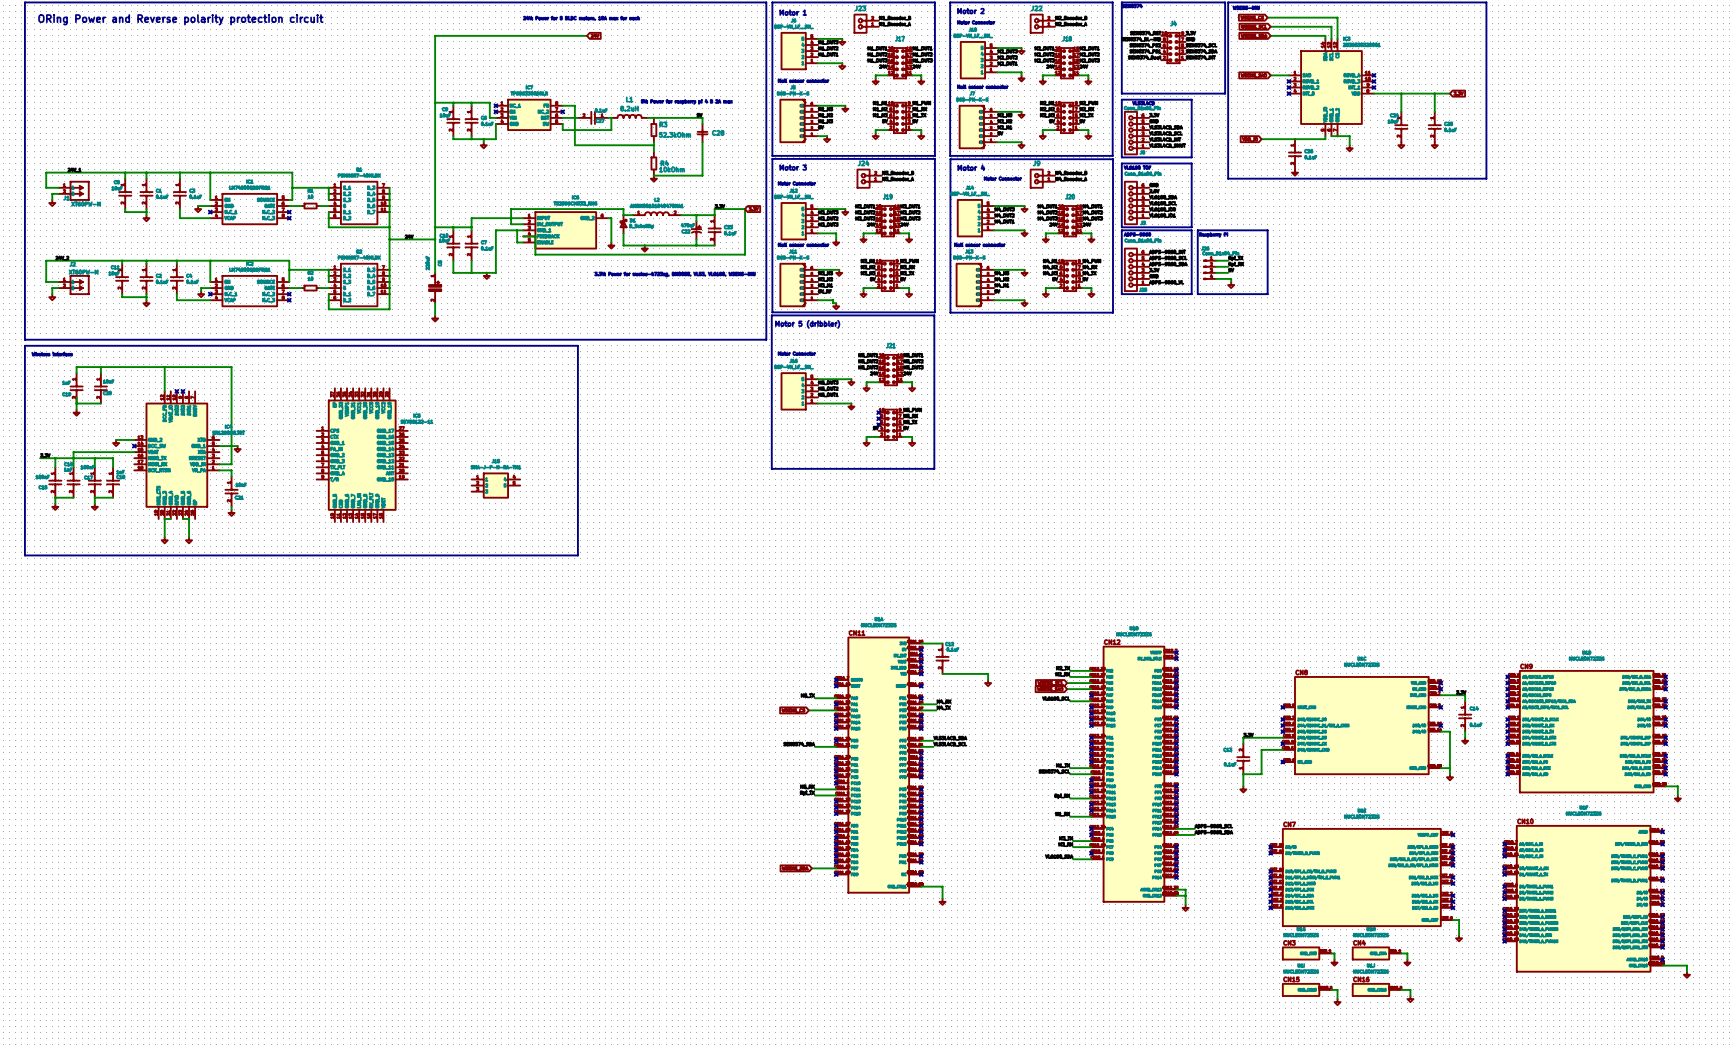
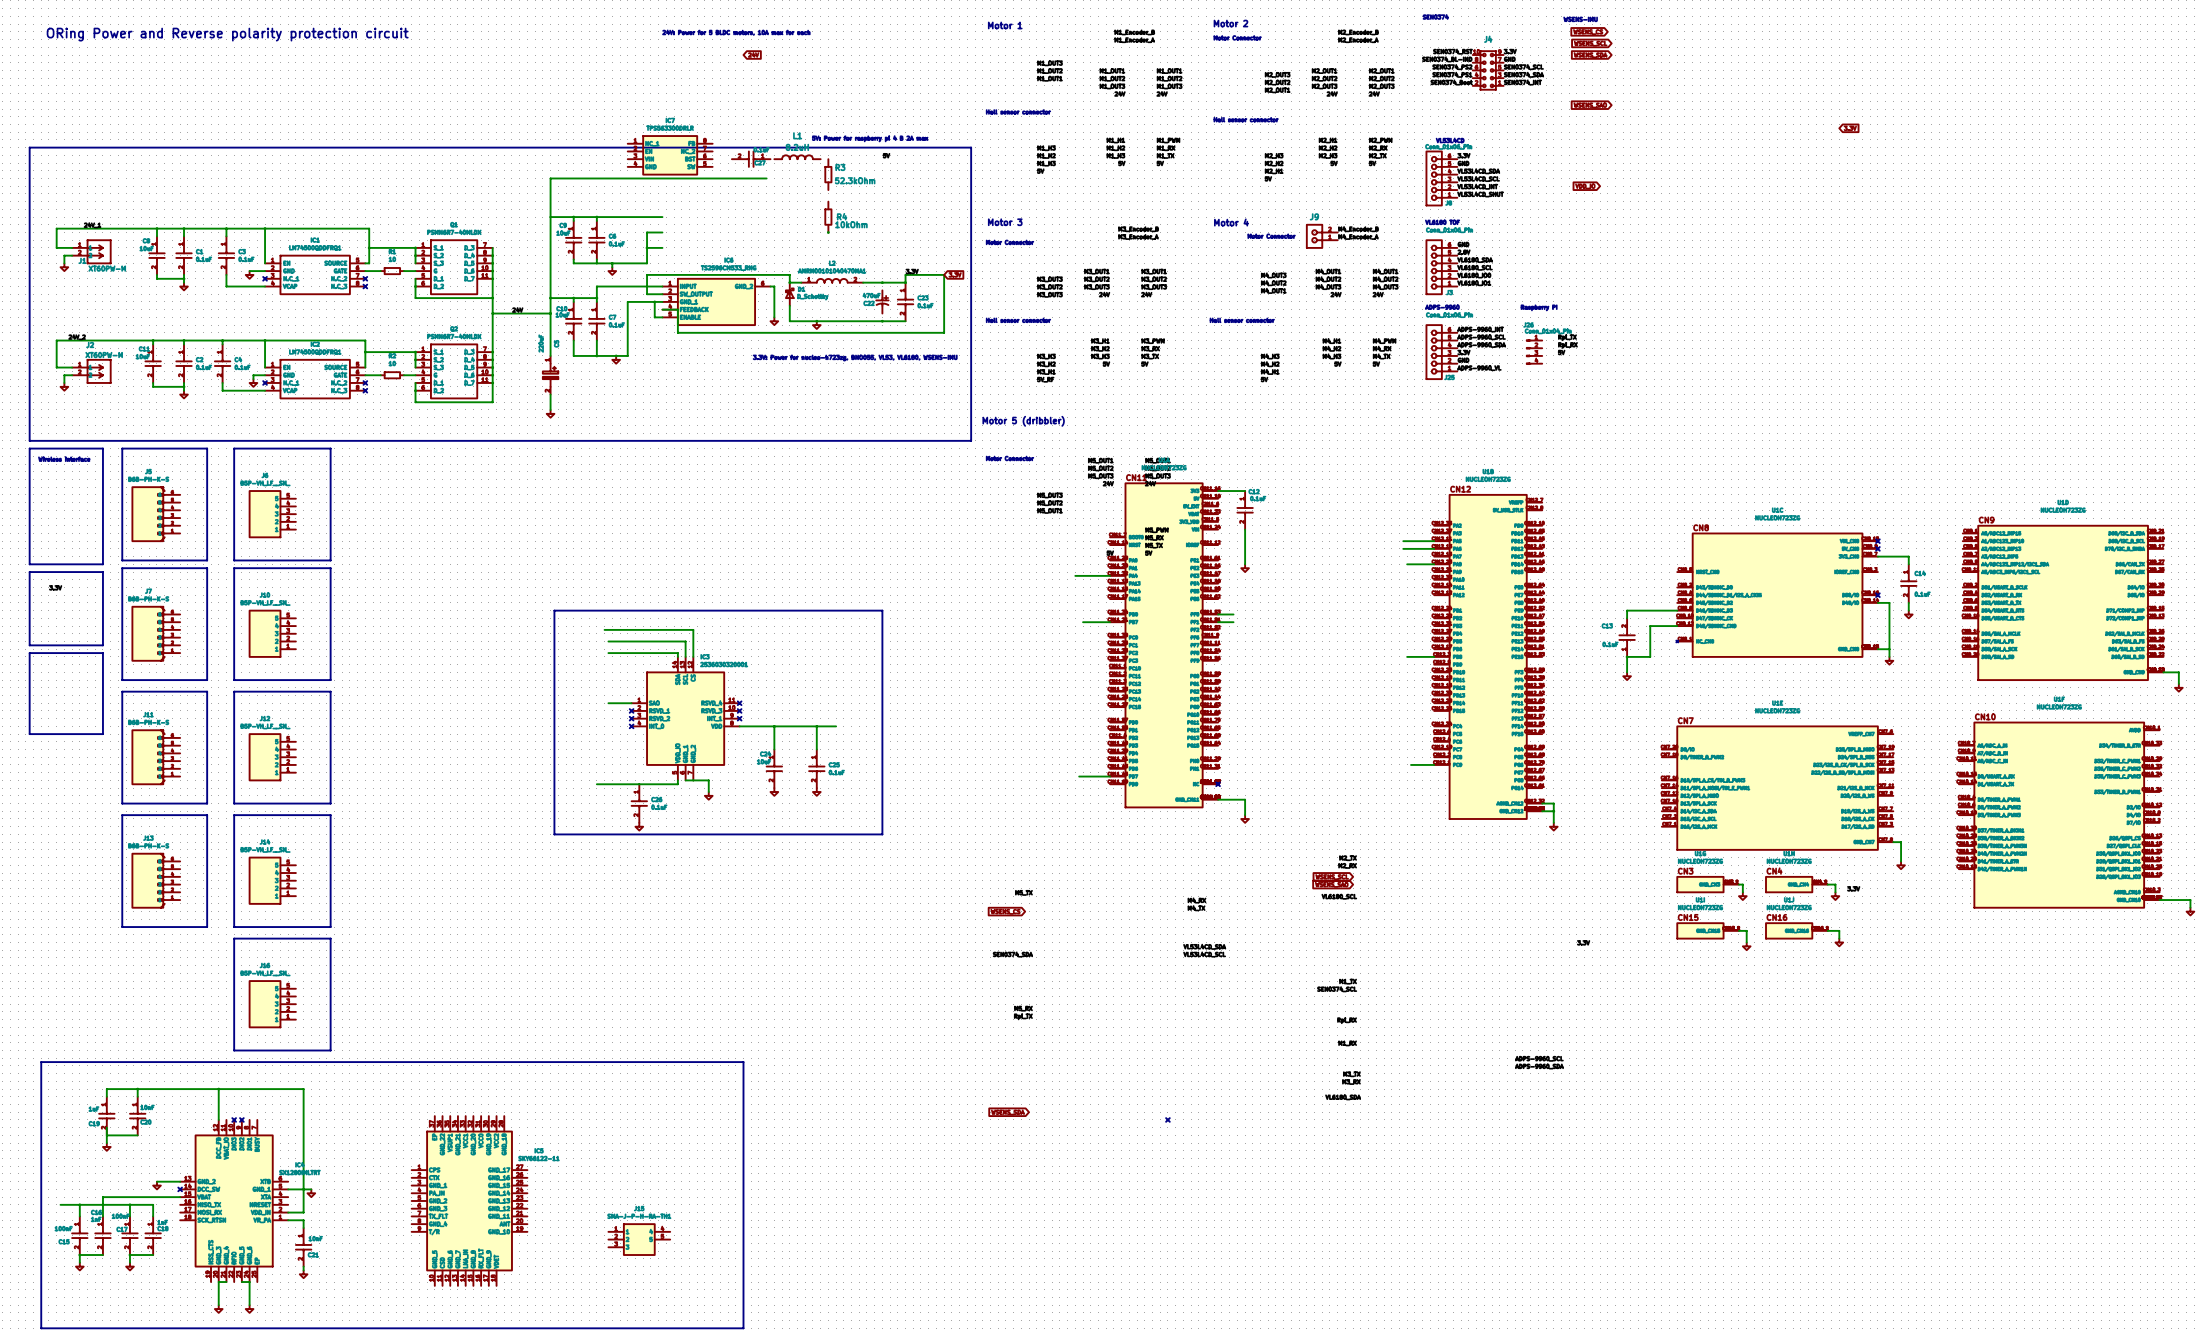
line: (772, 2) (934, 2) (934, 155) (772, 155) (772, 2) -> none
line: (950, 2) (1112, 2) (1112, 155) (950, 155) (950, 2) -> none
line: (1121, 2) (1225, 2) (1225, 93) (1121, 93) (1121, 2) -> none
line: (1228, 2) (1486, 2) (1486, 178) (1228, 178) (1228, 2) -> none
wire: (1267, 17) (1337, 17) (1337, 38) -> none
part: (866, 23) -> none
part: (1042, 23) -> none
wire: (1270, 26) (1331, 26) (1331, 38) -> none
wire: (587, 35) (435, 35) (435, 133) -> (766, 178) (550, 178)
wire: (1270, 35) (1325, 35) (1325, 38) -> none
wire: (817, 38) (842, 38) -> none
power symbol: (842, 41) -> none
wire: (997, 48) (1021, 48) -> none
part position: (799, 51) -> (272, 514)
power symbol: (1021, 51) -> none
part position: (978, 60) -> (272, 633)
wire: (817, 63) (842, 63) -> none
power symbol: (842, 66) -> none
wire: (997, 72) (1021, 72) (1021, 75) -> none
wire: (887, 75) (875, 75) (875, 78) -> none
wire: (912, 75) (921, 75) (921, 78) -> none
wire: (1054, 75) (1042, 75) (1042, 78) -> none
wire: (1079, 75) (1088, 75) (1088, 78) -> none
wire: (1270, 75) (1288, 75) -> none
no-connect mark: (1373, 75) -> none
power symbol: (1021, 78) -> none
power symbol: (875, 81) -> none
power symbol: (921, 81) -> none
power symbol: (1042, 81) -> none
power symbol: (1088, 81) -> none
no-connect mark: (1288, 81) -> none
no-connect mark: (1373, 81) -> none
no-connect mark: (1288, 87) -> none
part position: (1331, 87) -> (685, 718)
no-connect mark: (1373, 87) -> none
part: (900, 90) -> none
part: (1067, 90) -> none
no-connect mark: (1288, 93) -> none
wire: (1373, 93) (1449, 93) -> none
wire: (1401, 93) (1401, 111) -> none
wire: (1434, 93) (1434, 111) -> none
line: (1121, 99) (1121, 157) (1191, 157) (1191, 99) (1121, 99) -> none
wire: (435, 102) (489, 102) (489, 117) (495, 117) -> none
wire: (453, 102) (453, 105) -> none
wire: (471, 102) (471, 105) -> none
no-connect mark: (495, 105) -> none
wire: (562, 105) (574, 105) (574, 145) (653, 145) -> none
wire: (817, 105) (845, 105) -> none
line: (24, 108) (24, 2) (766, 2) (766, 108) -> (29, 147) (971, 147)
power symbol: (845, 108) -> none
no-connect mark: (495, 111) -> none
no-connect mark: (562, 111) -> none
wire: (997, 111) (1021, 111) -> none
power symbol: (1021, 114) -> none
wire: (562, 117) (577, 117) -> none
wire: (608, 117) (611, 117) (611, 130) (562, 130) (562, 123) -> none
wire: (647, 117) (702, 117) (702, 123) -> none
part position: (453, 120) -> (573, 240)
part position: (471, 120) -> (596, 240)
part position: (799, 120) -> (156, 514)
wire: (495, 123) (495, 139) (453, 139) (453, 136) -> none
part position: (978, 127) -> (156, 633)
part position: (1401, 127) -> (774, 768)
part position: (1434, 127) -> (816, 768)
wire: (887, 130) (875, 130) (875, 133) -> none
wire: (912, 130) (921, 130) (921, 133) -> none
wire: (1054, 130) (1042, 130) (1042, 133) -> none
wire: (1079, 130) (1088, 130) (1088, 133) -> none
part: (702, 133) -> none
wire: (471, 136) (471, 139) -> (573, 217) (573, 220)
wire: (817, 136) (827, 136) -> none
power symbol: (875, 136) -> none
power symbol: (921, 136) -> none
power symbol: (1042, 136) -> none
power symbol: (1088, 136) -> none
wire: (1325, 136) (1325, 139) (1261, 139) -> none
wire: (1331, 136) (1349, 136) (1349, 145) -> none
wire: (483, 139) (483, 142) -> (596, 217) (596, 220)
power symbol: (827, 139) -> none
wire: (653, 142) (653, 151) -> none
wire: (702, 142) (702, 175) (653, 175) -> none
wire: (997, 142) (1021, 142) -> none
power symbol: (483, 145) -> none
power symbol: (1021, 145) -> none
power symbol: (1401, 145) -> none
power symbol: (1434, 145) -> none
power symbol: (1349, 148) -> none
part position: (1294, 154) -> (639, 803)
line: (772, 158) (772, 312) (934, 312) (934, 158) (772, 158) -> none
line: (950, 159) (1112, 159) (1112, 312) (950, 312) (950, 159) -> none
wire: none -> (550, 217) (662, 217)
line: (1121, 163) (1121, 227) (1191, 227) (1191, 163) (1121, 163) -> none
power symbol: (1294, 172) -> none
wire: none -> (662, 232) (647, 232) (647, 263) (573, 263) (573, 259)
power symbol: (653, 178) -> none
part: (869, 178) -> none
wire: none -> (647, 247) (662, 247)
wire: none -> (596, 259) (596, 263)
wire: none -> (612, 263) (612, 267)
power symbol: none -> (612, 271)
wire: (994, 206) (1024, 206) -> none
wire: (817, 209) (845, 209) -> none
power symbol: (1024, 209) -> none
power symbol: (845, 212) -> none
wire: (696, 215) (696, 221) -> none
part position: (975, 218) -> (272, 880)
part position: (799, 221) -> (272, 757)
wire: (994, 230) (1024, 230) -> none
line: (1121, 230) (1191, 230) (1191, 294) (1121, 294) (1121, 230) -> none
line: (1197, 230) (1267, 230) (1267, 294) (1197, 294) (1197, 230) -> none
wire: (817, 233) (836, 233) (836, 239) -> none
wire: (875, 233) (863, 233) (863, 236) -> none
wire: (900, 233) (909, 233) (909, 236) -> none
power symbol: (1024, 233) -> none
wire: (1058, 233) (1045, 233) (1045, 236) -> none
wire: (1082, 233) (1091, 233) (1091, 236) -> none
wire: (696, 239) (696, 245) -> none
power symbol: (863, 239) -> none
power symbol: (909, 239) -> none
power symbol: (1045, 239) -> none
power symbol: (1091, 239) -> none
power symbol: (836, 242) -> none
part: (887, 248) -> none
part: (1070, 248) -> none
wire: (1215, 260) (1228, 260) -> none
wire: (1215, 266) (1228, 266) -> none
wire: (817, 269) (839, 269) -> none
wire: (994, 269) (1024, 269) -> none
power symbol: (839, 272) -> none
power symbol: (1024, 272) -> none
wire: (1215, 272) (1228, 272) -> none
wire: (1215, 278) (1231, 278) (1231, 281) -> none
part position: (799, 285) -> (156, 757)
part position: (975, 285) -> (156, 880)
power symbol: (1231, 285) -> none
wire: (875, 288) (863, 288) (863, 291) -> none
wire: (900, 288) (909, 288) (909, 291) -> none
wire: (1058, 288) (1045, 288) (1045, 291) -> none
wire: (1082, 288) (1091, 288) (1091, 291) -> none
power symbol: (863, 294) -> none
power symbol: (909, 294) -> none
power symbol: (1045, 294) -> none
power symbol: (1091, 294) -> none
wire: (817, 300) (833, 300) (833, 303) (836, 303) -> none
wire: (994, 300) (1024, 300) -> none
power symbol: (1024, 303) -> none
power symbol: (836, 306) -> none
line: (771, 315) (934, 315) (934, 468) (771, 468) (771, 315) -> none
line: (82, 345) (97, 345) -> (207, 448) (207, 560) (122, 560) (122, 448)
line: none -> (102, 448) (102, 564) (29, 564)
line: (164, 345) (185, 345) -> (330, 448) (330, 560) (234, 560) (234, 448)
line: (261, 345) (577, 345) (577, 555) (24, 555) -> none
wire: (100, 367) (100, 373) -> none
wire: (76, 373) (76, 367) (231, 367) (231, 464) (219, 464) -> none
wire: (817, 379) (851, 379) -> none
wire: none -> (1218, 491) (1245, 491)
power symbol: (851, 382) -> none
wire: (878, 382) (866, 382) (866, 385) -> none
part position: (76, 388) -> (106, 1116)
part position: (100, 388) -> (137, 1116)
power symbol: (866, 388) -> none
power symbol: (912, 388) -> none
no-connect mark: (176, 391) -> none
no-connect mark: (182, 391) -> none
part position: (799, 391) -> (272, 1004)
wire: (76, 397) (76, 409) -> none
part: (890, 397) -> none
wire: (76, 403) (100, 403) -> none
wire: (817, 403) (851, 403) -> none
power symbol: (851, 406) -> none
wire: none -> (1245, 529) (1245, 564)
power symbol: (76, 412) -> none
no-connect mark: (878, 412) -> none
no-connect mark: (878, 418) -> none
wire: none -> (1403, 541) (1434, 541)
no-connect mark: none -> (1877, 541)
no-connect mark: (878, 424) -> none
wire: none -> (1403, 548) (1434, 548)
no-connect mark: none -> (1877, 548)
wire: none -> (1877, 556) (1908, 556) (1908, 564)
line: (24, 436) (24, 443) -> (29, 645) (102, 645) (102, 572) (29, 572)
wire: (878, 436) (866, 436) (866, 439) -> none
wire: none -> (1407, 564) (1434, 564)
line: none -> (122, 568) (207, 568) (207, 680) (122, 680) (122, 568)
line: none -> (234, 568) (330, 568) (330, 680) (234, 680) (234, 568)
power symbol: none -> (1245, 568)
power symbol: (116, 443) -> none
power symbol: (866, 443) -> none
power symbol: (912, 443) -> none
no-connect mark: (134, 446) -> none
wire: (219, 446) (237, 446) -> none
wire: none -> (1075, 575) (1110, 575)
power symbol: (237, 449) -> none
wire: (134, 452) (73, 452) (73, 467) -> none
part position: (176, 455) -> (234, 1200)
part position: (362, 455) -> (469, 1200)
wire: (40, 458) (113, 458) (113, 467) -> none
wire: (55, 458) (55, 467) -> none
wire: (94, 458) (94, 467) -> none
no-connect mark: none -> (1877, 595)
wire: none -> (1877, 602) (1889, 602) (1889, 656)
wire: none -> (1908, 602) (1908, 610)
wire: (219, 470) (231, 470) (231, 476) -> none
line: none -> (554, 610) (882, 610) (882, 834) (554, 834) (554, 610)
wire: none -> (1677, 610) (1627, 610) (1627, 618)
wire: none -> (1218, 614) (1233, 614)
power symbol: none -> (1908, 614)
part position: (55, 482) -> (79, 1235)
part position: (73, 482) -> (102, 1235)
part position: (94, 482) -> (129, 1235)
part position: (113, 482) -> (153, 1235)
wire: none -> (1083, 622) (1110, 622)
wire: none -> (1218, 622) (1233, 622)
part position: (495, 485) -> (639, 1239)
wire: none -> (1677, 626) (1650, 626) (1650, 656) (1627, 656) (1627, 672)
wire: none -> (604, 629) (693, 629) (693, 656)
part position: (231, 491) -> (303, 1247)
wire: (73, 497) (55, 497) (55, 503) -> none
wire: (113, 497) (94, 497) (94, 503) -> none
wire: none -> (608, 641) (685, 641) (685, 656)
line: (24, 500) (24, 506) -> (29, 714) (29, 734) (102, 734) (102, 653) (29, 653)
wire: none -> (1877, 649) (1889, 649)
power symbol: (55, 506) -> none
power symbol: (94, 506) -> none
wire: (231, 506) (231, 509) -> none
wire: none -> (608, 653) (677, 653) (677, 656)
wire: none -> (1407, 656) (1434, 656)
power symbol: (231, 512) -> none
power symbol: none -> (1889, 660)
wire: (170, 518) (164, 518) (164, 537) -> none
wire: (182, 518) (189, 518) (189, 537) -> none
wire: none -> (2163, 672) (2178, 672) (2178, 683)
power symbol: none -> (1627, 676)
power symbol: none -> (2178, 687)
line: none -> (122, 691) (122, 803) (207, 803) (207, 691) (122, 691)
line: none -> (234, 691) (234, 803) (330, 803) (330, 691) (234, 691)
power symbol: (164, 540) -> none
power symbol: (189, 540) -> none
wire: none -> (608, 703) (631, 703)
no-connect mark: none -> (739, 703)
no-connect mark: none -> (631, 710)
no-connect mark: none -> (739, 710)
no-connect mark: none -> (631, 718)
no-connect mark: none -> (739, 718)
no-connect mark: none -> (631, 726)
wire: none -> (739, 726) (836, 726)
wire: none -> (774, 726) (774, 749)
wire: none -> (816, 726) (816, 749)
wire: none -> (1411, 764) (1434, 764)
wire: none -> (1079, 776) (1110, 776)
wire: none -> (677, 780) (677, 784) (596, 784)
wire: none -> (685, 780) (708, 780) (708, 791)
no-connect mark: none -> (1218, 784)
power symbol: none -> (774, 791)
power symbol: none -> (816, 791)
power symbol: none -> (708, 795)
wire: none -> (1218, 799) (1245, 799) (1245, 815)
wire: none -> (1542, 803) (1553, 803) (1553, 822)
wire: none -> (1542, 811) (1553, 811)
line: none -> (122, 815) (122, 927) (207, 927) (207, 815) (122, 815)
line: none -> (234, 815) (330, 815) (330, 927) (234, 927) (234, 815)
power symbol: none -> (639, 826)
wire: (921, 643) (942, 643) -> none
power symbol: none -> (1553, 826)
no-connect mark: (921, 649) -> none
no-connect mark: (1176, 652) -> none
no-connect mark: (921, 655) -> none
wire: none -> (1893, 842) (1901, 842) (1901, 861)
part position: (942, 658) -> (1245, 510)
no-connect mark: (1176, 658) -> none
no-connect mark: (921, 661) -> none
no-connect mark: (921, 667) -> none
wire: (1070, 670) (1091, 670) -> none
no-connect mark: (1176, 670) -> none
no-connect mark: (921, 673) -> none
wire: (942, 673) (988, 673) (988, 680) -> none
power symbol: none -> (1901, 865)
wire: (1070, 676) (1091, 676) -> none
no-connect mark: (1176, 676) -> none
no-connect mark: (1507, 676) -> none
no-connect mark: (1665, 676) -> none
no-connect mark: (836, 680) -> none
power symbol position: (988, 683) -> (1245, 818)
wire: (1067, 683) (1091, 683) -> none
no-connect mark: (1176, 683) -> none
no-connect mark: (1440, 683) -> none
no-connect mark: (1507, 683) -> none
no-connect mark: (1665, 683) -> none
no-connect mark: (836, 686) -> none
no-connect mark: (921, 686) -> none
wire: (1067, 689) (1091, 689) -> none
no-connect mark: (1176, 689) -> none
wire: none -> (1827, 884) (1835, 884) (1835, 892)
no-connect mark: (1440, 689) -> none
no-connect mark: (1507, 689) -> none
no-connect mark: (1665, 689) -> none
no-connect mark: (1091, 695) -> none
no-connect mark: (1176, 695) -> none
wire: (1440, 695) (1465, 695) (1465, 701) -> none
no-connect mark: (1507, 695) -> none
wire: (814, 698) (836, 698) -> none
no-connect mark: (921, 698) -> none
power symbol: none -> (1742, 896)
power symbol: none -> (1835, 896)
wire: (1070, 701) (1091, 701) -> none
no-connect mark: (1176, 701) -> none
no-connect mark: (1507, 701) -> none
no-connect mark: (1665, 701) -> none
wire: none -> (2159, 900) (2190, 900) (2190, 907)
no-connect mark: (836, 704) -> none
wire: (921, 704) (936, 704) -> none
no-connect mark: (1091, 707) -> none
no-connect mark: (1176, 707) -> none
no-connect mark: (1282, 707) -> none
no-connect mark: (1440, 707) -> none
no-connect mark: (1507, 707) -> none
no-connect mark: (1665, 707) -> none
wire: (808, 710) (836, 710) -> none
wire: (921, 710) (936, 710) -> none
power symbol: none -> (2190, 911)
no-connect mark: (1091, 713) -> none
no-connect mark: (836, 716) -> none
no-connect mark: (921, 716) -> none
part position: (1465, 716) -> (1908, 583)
no-connect mark: (1091, 719) -> none
no-connect mark: (1176, 719) -> none
no-connect mark: (1282, 719) -> none
no-connect mark: (1507, 719) -> none
no-connect mark: (1665, 719) -> none
no-connect mark: (836, 722) -> none
no-connect mark: (921, 722) -> none
no-connect mark: (1091, 725) -> none
no-connect mark: (1176, 725) -> none
no-connect mark: (1282, 725) -> none
part position: (1361, 725) -> (1777, 595)
wire: none -> (1827, 930) (1839, 930) (1839, 938)
no-connect mark: (1440, 725) -> none
no-connect mark: (1507, 725) -> none
no-connect mark: (1665, 725) -> none
no-connect mark: (836, 728) -> none
no-connect mark: (921, 728) -> none
line: none -> (234, 938) (234, 1050) (330, 1050) (330, 938) (234, 938)
no-connect mark: (1176, 731) -> none
no-connect mark: (1282, 731) -> none
wire: (1440, 731) (1449, 731) (1449, 774) -> none
wire: (1465, 731) (1465, 737) -> none
no-connect mark: (1507, 731) -> none
part position: (1586, 731) -> (2063, 602)
no-connect mark: (1091, 737) -> none
no-connect mark: (1176, 737) -> none
wire: (1282, 737) (1243, 737) (1243, 743) -> none
power symbol: none -> (1746, 946)
no-connect mark: (1507, 737) -> none
no-connect mark: (1665, 737) -> none
no-connect mark: (836, 740) -> none
wire: (921, 740) (933, 740) -> none
power symbol position: (1465, 740) -> (1839, 942)
no-connect mark: (1091, 743) -> none
no-connect mark: (1176, 743) -> none
no-connect mark: (1282, 743) -> none
no-connect mark: (1507, 743) -> none
no-connect mark: (1665, 743) -> none
wire: (814, 746) (836, 746) -> none
wire: (921, 746) (933, 746) -> none
no-connect mark: (1091, 749) -> none
no-connect mark: (1176, 749) -> none
wire: (1282, 749) (1261, 749) (1261, 774) (1243, 774) (1243, 786) -> none
no-connect mark: (921, 752) -> none
no-connect mark: (1091, 755) -> none
no-connect mark: (1176, 755) -> none
no-connect mark: (1507, 755) -> none
no-connect mark: (1665, 755) -> none
no-connect mark: (836, 759) -> none
no-connect mark: (921, 759) -> none
part position: (1243, 759) -> (1627, 637)
no-connect mark: (1091, 762) -> none
no-connect mark: (1176, 762) -> none
no-connect mark: (1282, 762) -> none
no-connect mark: (1507, 762) -> none
no-connect mark: (1665, 762) -> none
no-connect mark: (836, 765) -> none
part position: (879, 765) -> (1164, 645)
no-connect mark: (921, 765) -> none
wire: (1070, 768) (1091, 768) -> none
no-connect mark: (1176, 768) -> none
wire: (1440, 768) (1449, 768) -> none
no-connect mark: (1507, 768) -> none
no-connect mark: (1665, 768) -> none
no-connect mark: (836, 771) -> none
no-connect mark: (921, 771) -> none
wire: (1070, 774) (1091, 774) -> none
part position: (1133, 774) -> (1488, 656)
no-connect mark: (1176, 774) -> none
no-connect mark: (1507, 774) -> none
no-connect mark: (1665, 774) -> none
no-connect mark: (836, 777) -> none
no-connect mark: (921, 777) -> none
power symbol: (1449, 777) -> none
no-connect mark: (1091, 780) -> none
no-connect mark: (836, 783) -> none
no-connect mark: (1091, 786) -> none
no-connect mark: (1176, 786) -> none
wire: (1665, 786) (1677, 786) (1677, 795) -> none
wire: (814, 789) (836, 789) -> none
no-connect mark: (921, 789) -> none
power symbol: (1243, 789) -> none
no-connect mark: (1091, 792) -> none
no-connect mark: (1176, 792) -> none
wire: (814, 795) (836, 795) -> none
no-connect mark: (921, 795) -> none
wire: (1070, 798) (1091, 798) -> none
no-connect mark: (1176, 798) -> none
power symbol: (1677, 798) -> none
no-connect mark: (836, 801) -> none
no-connect mark: (921, 801) -> none
no-connect mark: (1091, 804) -> none
no-connect mark: (1176, 804) -> none
no-connect mark: (836, 807) -> none
no-connect mark: (921, 807) -> none
no-connect mark: (1091, 810) -> none
no-connect mark: (1176, 810) -> none
no-connect mark: (836, 813) -> none
no-connect mark: (921, 813) -> none
wire: (1070, 816) (1091, 816) -> none
no-connect mark: (1176, 816) -> none
no-connect mark: (921, 819) -> none
no-connect mark: (1176, 822) -> none
no-connect mark: (836, 825) -> none
no-connect mark: (921, 825) -> none
line: none -> (41, 1062) (743, 1062) (743, 1328) (41, 1328) (41, 1062)
no-connect mark: (1091, 828) -> none
wire: (1176, 828) (1194, 828) -> none
no-connect mark: (836, 831) -> none
no-connect mark: (921, 831) -> none
no-connect mark: (1662, 831) -> none
no-connect mark: (1091, 834) -> none
wire: (1176, 834) (1194, 834) -> none
no-connect mark: (1452, 834) -> none
no-connect mark: (836, 838) -> none
no-connect mark: (921, 838) -> none
wire: (1073, 841) (1091, 841) -> none
no-connect mark: (836, 844) -> none
no-connect mark: (921, 844) -> none
no-connect mark: (1504, 844) -> none
no-connect mark: (1662, 844) -> none
wire: (1073, 847) (1091, 847) -> none
no-connect mark: (1176, 847) -> none
no-connect mark: (1270, 847) -> none
no-connect mark: (1452, 847) -> none
wire: none -> (137, 1089) (137, 1096)
wire: none -> (218, 1089) (218, 1119)
no-connect mark: (836, 850) -> none
no-connect mark: (1504, 850) -> none
no-connect mark: (1091, 853) -> none
no-connect mark: (1176, 853) -> none
no-connect mark: (1270, 853) -> none
no-connect mark: (1452, 853) -> none
wire: none -> (106, 1096) (106, 1089) (303, 1089) (303, 1212) (288, 1212)
no-connect mark: (836, 856) -> none
no-connect mark: (921, 856) -> none
no-connect mark: (1504, 856) -> none
no-connect mark: (1662, 856) -> none
wire: (1073, 859) (1091, 859) -> none
no-connect mark: (1176, 859) -> none
no-connect mark: (1452, 859) -> none
no-connect mark: (836, 862) -> none
no-connect mark: (921, 862) -> none
no-connect mark: (1662, 862) -> none
no-connect mark: (1176, 865) -> none
no-connect mark: (1452, 865) -> none
wire: (811, 868) (836, 868) -> none
no-connect mark: (1504, 868) -> none
no-connect mark: (1662, 868) -> none
no-connect mark: (1176, 871) -> none
no-connect mark: (1270, 871) -> none
no-connect mark: none -> (234, 1119)
no-connect mark: none -> (241, 1119)
no-connect mark: (836, 874) -> none
no-connect mark: (1504, 874) -> none
no-connect mark: (1176, 877) -> none
no-connect mark: (1270, 877) -> none
part position: (1361, 877) -> (1777, 788)
no-connect mark: (1452, 877) -> none
wire: none -> (106, 1127) (106, 1143)
no-connect mark: (1662, 880) -> none
no-connect mark: (1270, 883) -> none
no-connect mark: (1452, 883) -> none
wire: none -> (106, 1135) (137, 1135)
wire: (921, 886) (942, 886) (942, 898) -> none
no-connect mark: (1504, 886) -> none
wire: (1176, 889) (1185, 889) (1185, 904) -> none
no-connect mark: (1270, 889) -> none
no-connect mark: (1504, 892) -> none
no-connect mark: (1662, 892) -> none
power symbol: none -> (106, 1146)
wire: (1176, 895) (1185, 895) -> none
no-connect mark: (1270, 895) -> none
no-connect mark: (1452, 895) -> none
no-connect mark: (1504, 898) -> none
part position: (1583, 898) -> (2059, 815)
no-connect mark: (1662, 898) -> none
power symbol: (942, 901) -> none
no-connect mark: (1270, 901) -> none
no-connect mark: (1452, 901) -> none
no-connect mark: (1662, 904) -> none
power symbol: (1185, 907) -> none
no-connect mark: (1270, 907) -> none
no-connect mark: (1452, 907) -> none
no-connect mark: (1504, 910) -> none
no-connect mark: (1504, 917) -> none
no-connect mark: (1662, 917) -> none
wire: (1452, 920) (1459, 920) (1459, 935) -> none
wire: none -> (156, 1181) (180, 1181)
no-connect mark: (1504, 923) -> none
no-connect mark: (1662, 923) -> none
power symbol: none -> (156, 1185)
no-connect mark: none -> (180, 1189)
wire: none -> (288, 1189) (311, 1189)
no-connect mark: (1504, 929) -> none
no-connect mark: (1662, 929) -> none
power symbol: none -> (311, 1193)
wire: none -> (180, 1197) (102, 1197) (102, 1216)
no-connect mark: (1504, 935) -> none
no-connect mark: (1662, 935) -> none
power symbol: (1459, 938) -> none
wire: none -> (60, 1204) (153, 1204) (153, 1216)
wire: none -> (79, 1204) (79, 1216)
wire: none -> (129, 1204) (129, 1216)
no-connect mark: (1504, 941) -> none
no-connect mark: (1662, 941) -> none
no-connect mark: (1662, 947) -> none
wire: none -> (288, 1220) (303, 1220) (303, 1227)
part position: (1307, 953) -> (1707, 884)
wire: (1331, 953) (1334, 953) (1334, 959) -> none
part position: (1376, 953) -> (1796, 884)
wire: (1401, 953) (1407, 953) (1407, 959) -> none
no-connect mark: (1662, 959) -> none
power symbol: (1334, 962) -> none
power symbol: (1407, 962) -> none
wire: (1662, 965) (1686, 965) (1686, 971) -> none
power symbol: (1686, 974) -> none
wire: none -> (102, 1255) (79, 1255) (79, 1262)
wire: none -> (153, 1255) (129, 1255) (129, 1262)
power symbol: none -> (79, 1266)
power symbol: none -> (129, 1266)
wire: none -> (303, 1266) (303, 1270)
part position: (1307, 989) -> (1707, 930)
wire: (1331, 989) (1337, 989) (1337, 999) -> none
part position: (1376, 989) -> (1796, 930)
wire: (1401, 989) (1410, 989) (1410, 996) -> none
power symbol: none -> (303, 1274)
power symbol: (1410, 999) -> none
wire: none -> (226, 1282) (218, 1282) (218, 1305)
wire: none -> (241, 1282) (249, 1282) (249, 1305)
power symbol: (1337, 1002) -> none
power symbol: none -> (218, 1309)
power symbol: none -> (249, 1309)

